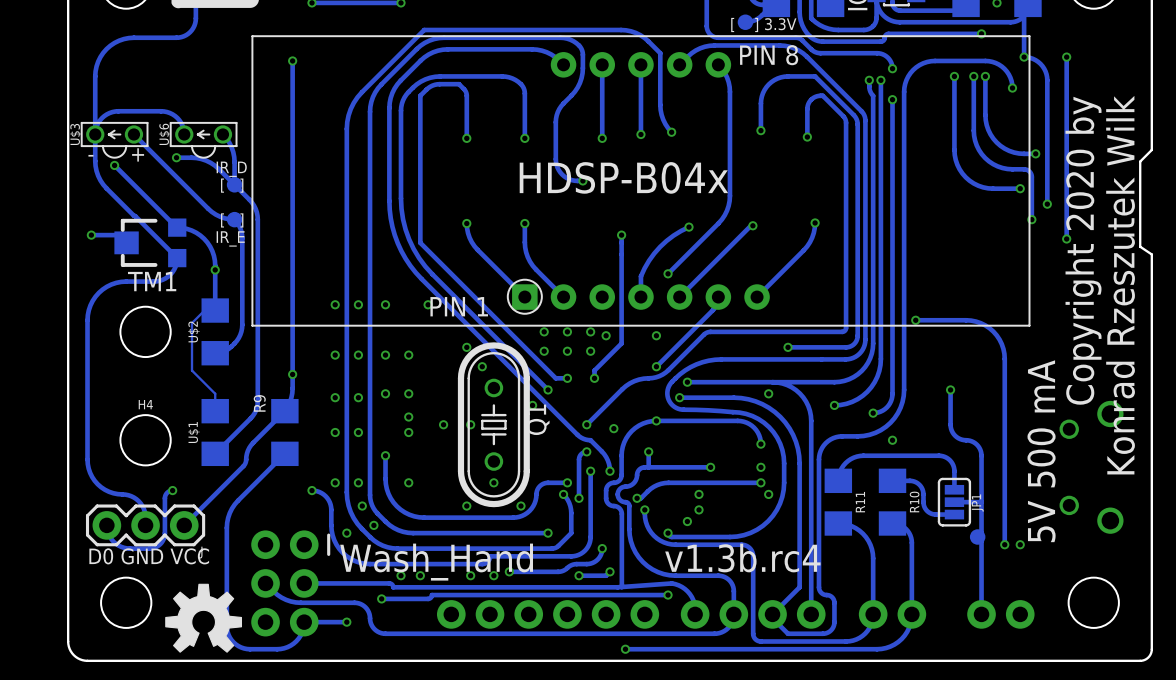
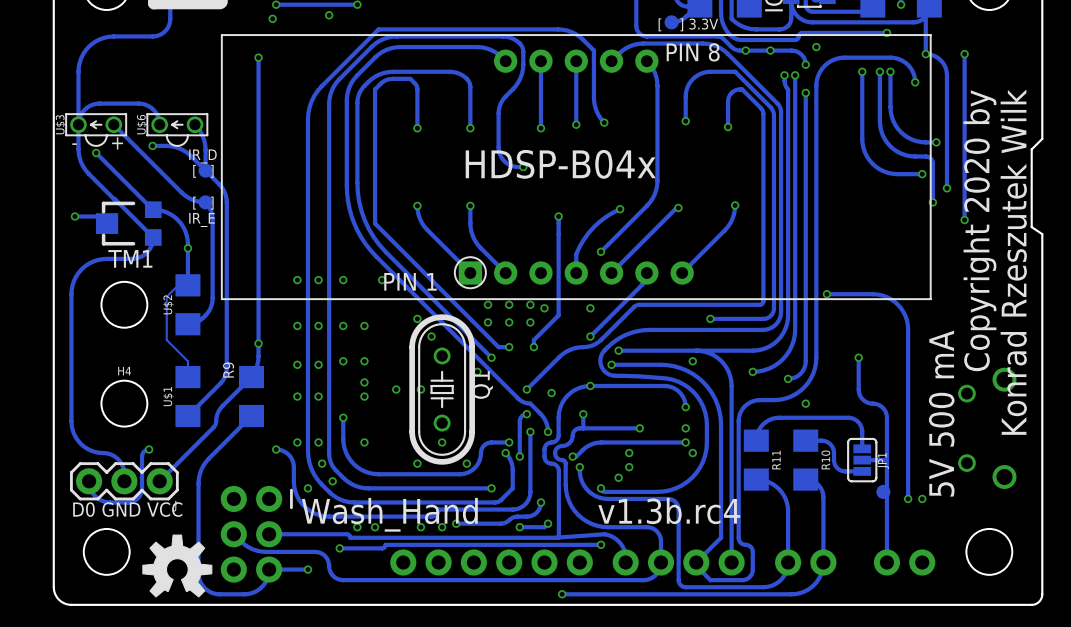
via: none -> (329, 15)
via: none -> (272, 18)
via: none -> (816, 47)
via: none -> (745, 50)
via: none -> (770, 50)

